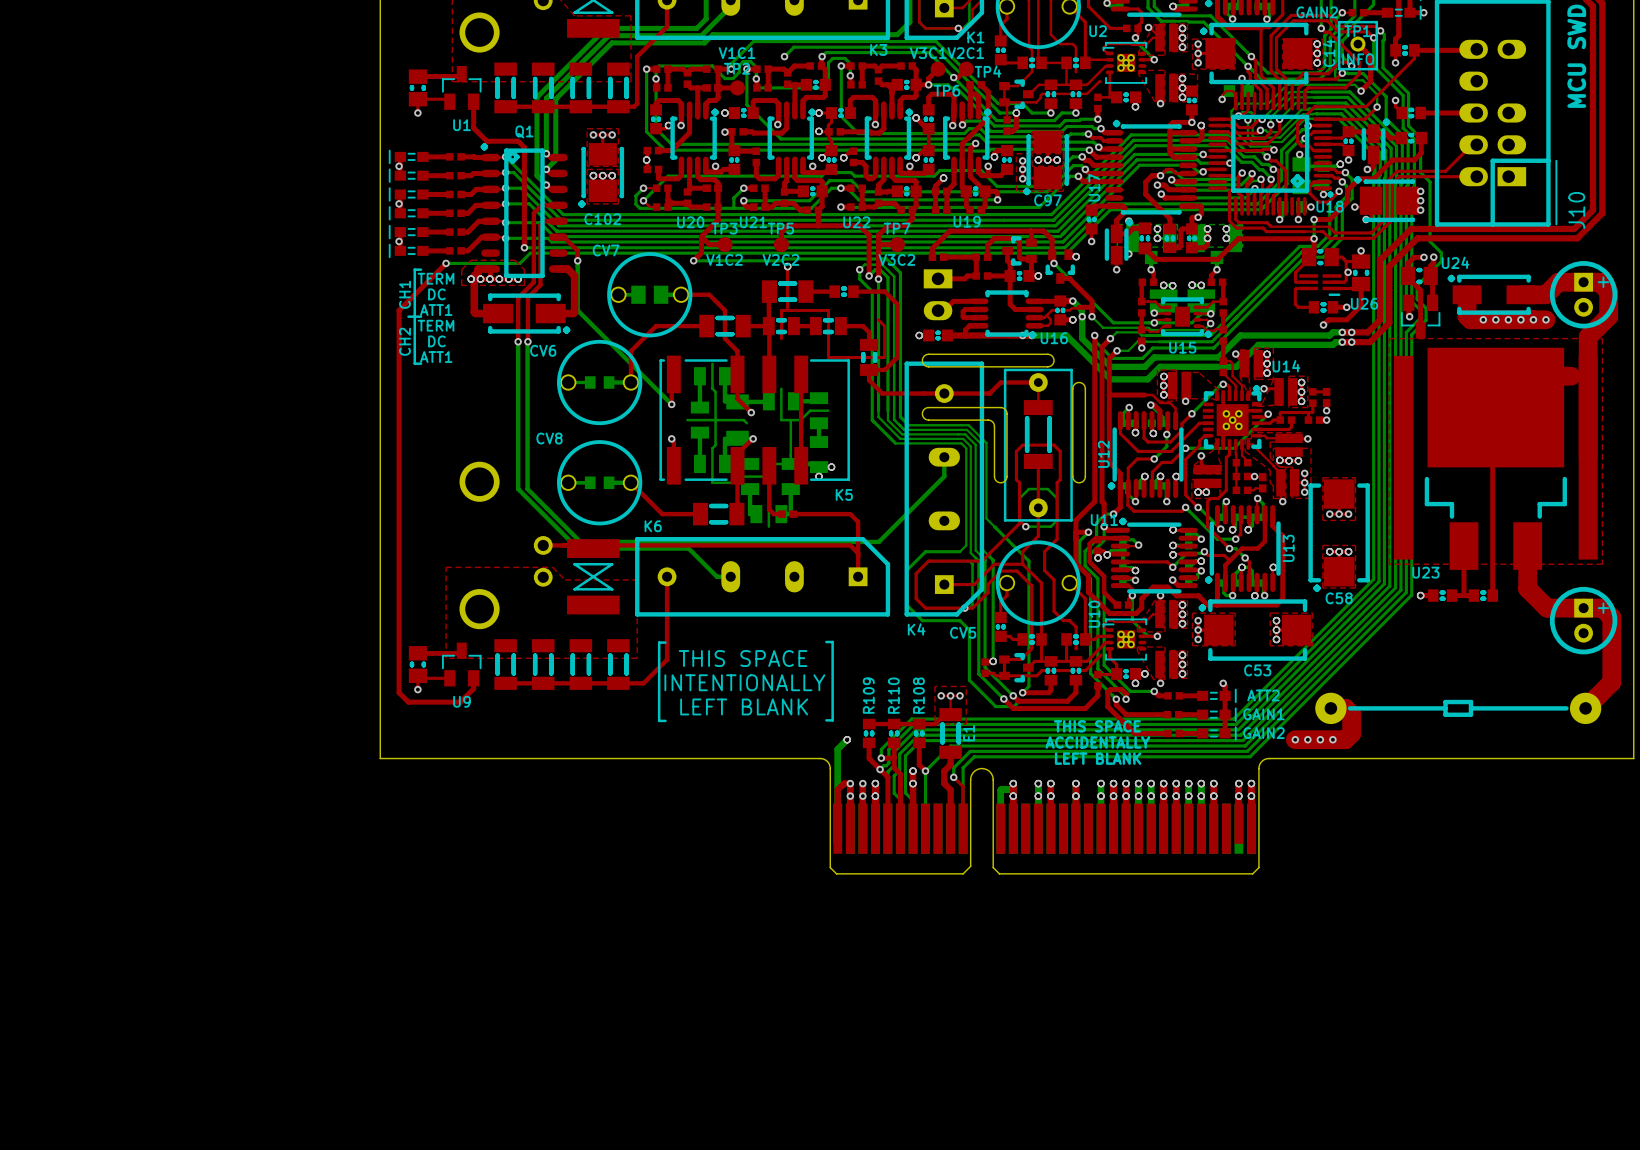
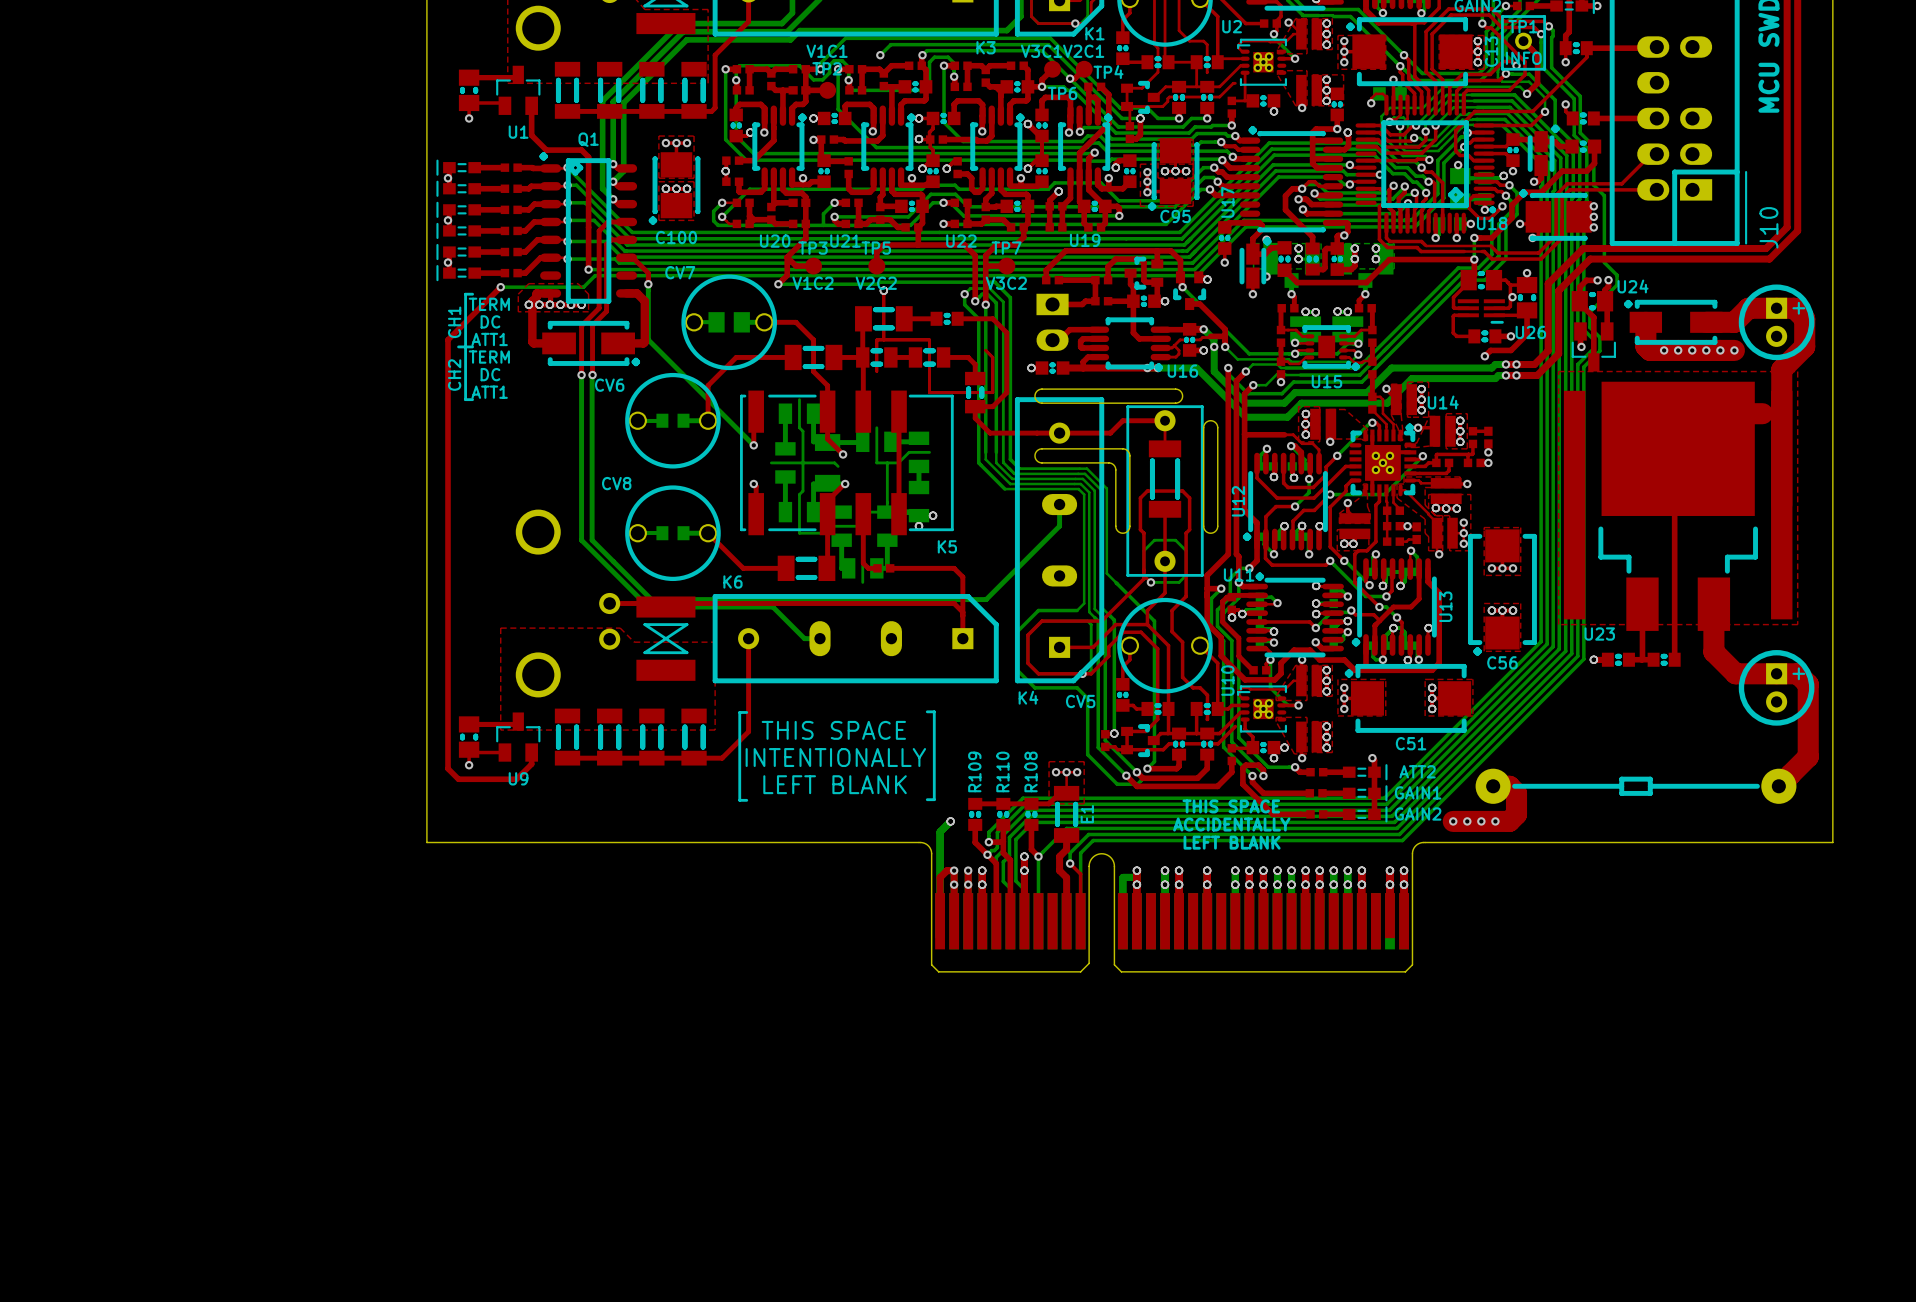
C14 name: C14 (1329, 53) -> C13 (1491, 51)
C97 name: C97 (1047, 200) -> C95 (1175, 216)
C102 name: C102 (602, 219) -> C100 (676, 237)
C58 name: C58 (1339, 598) -> C56 (1502, 662)
C53 name: C53 (1257, 670) -> C51 (1411, 743)

